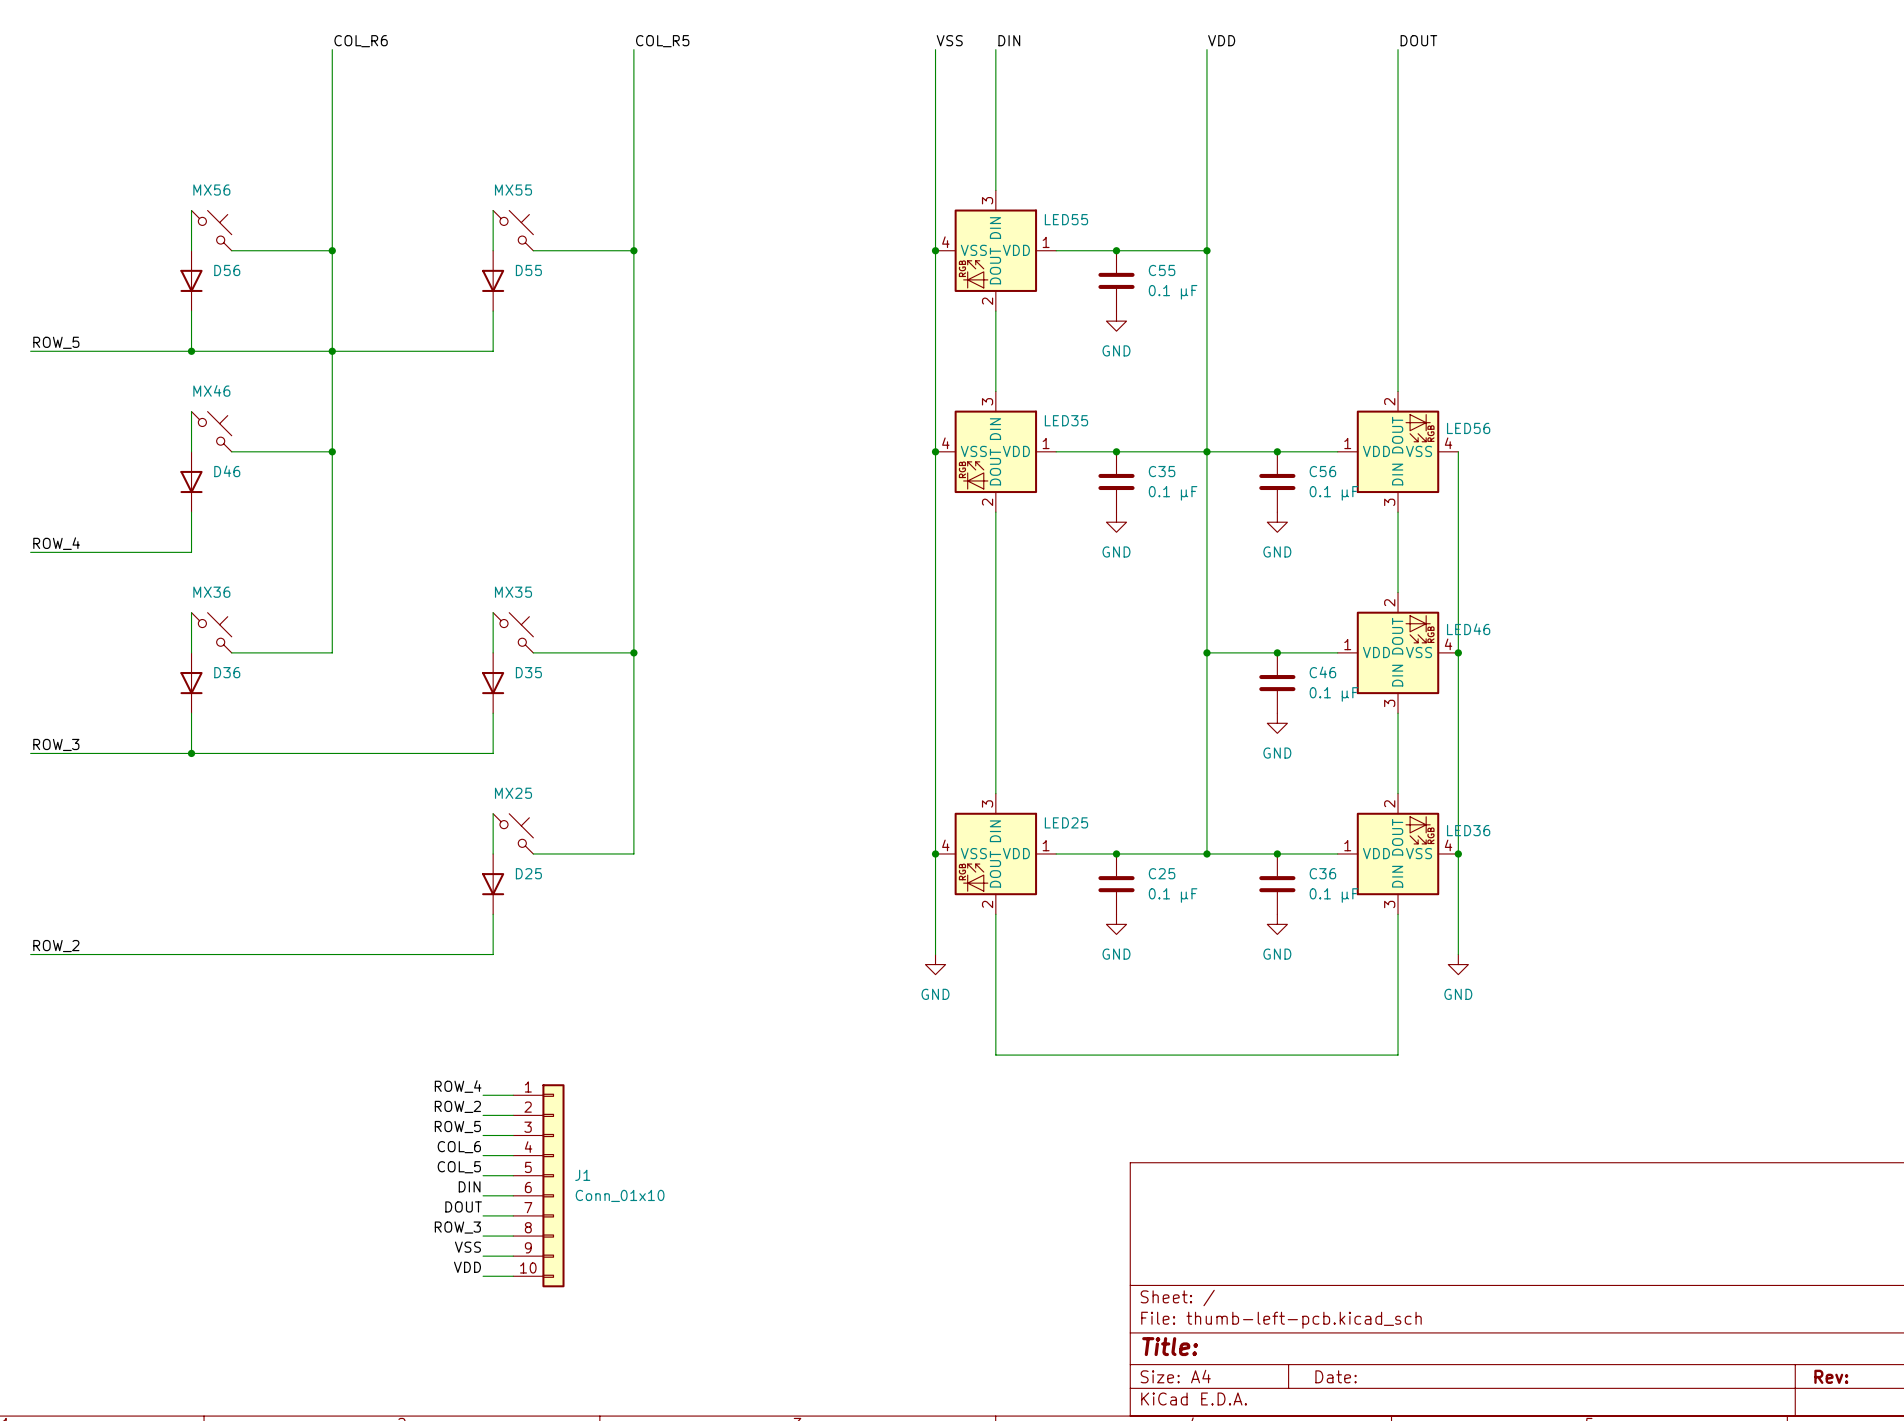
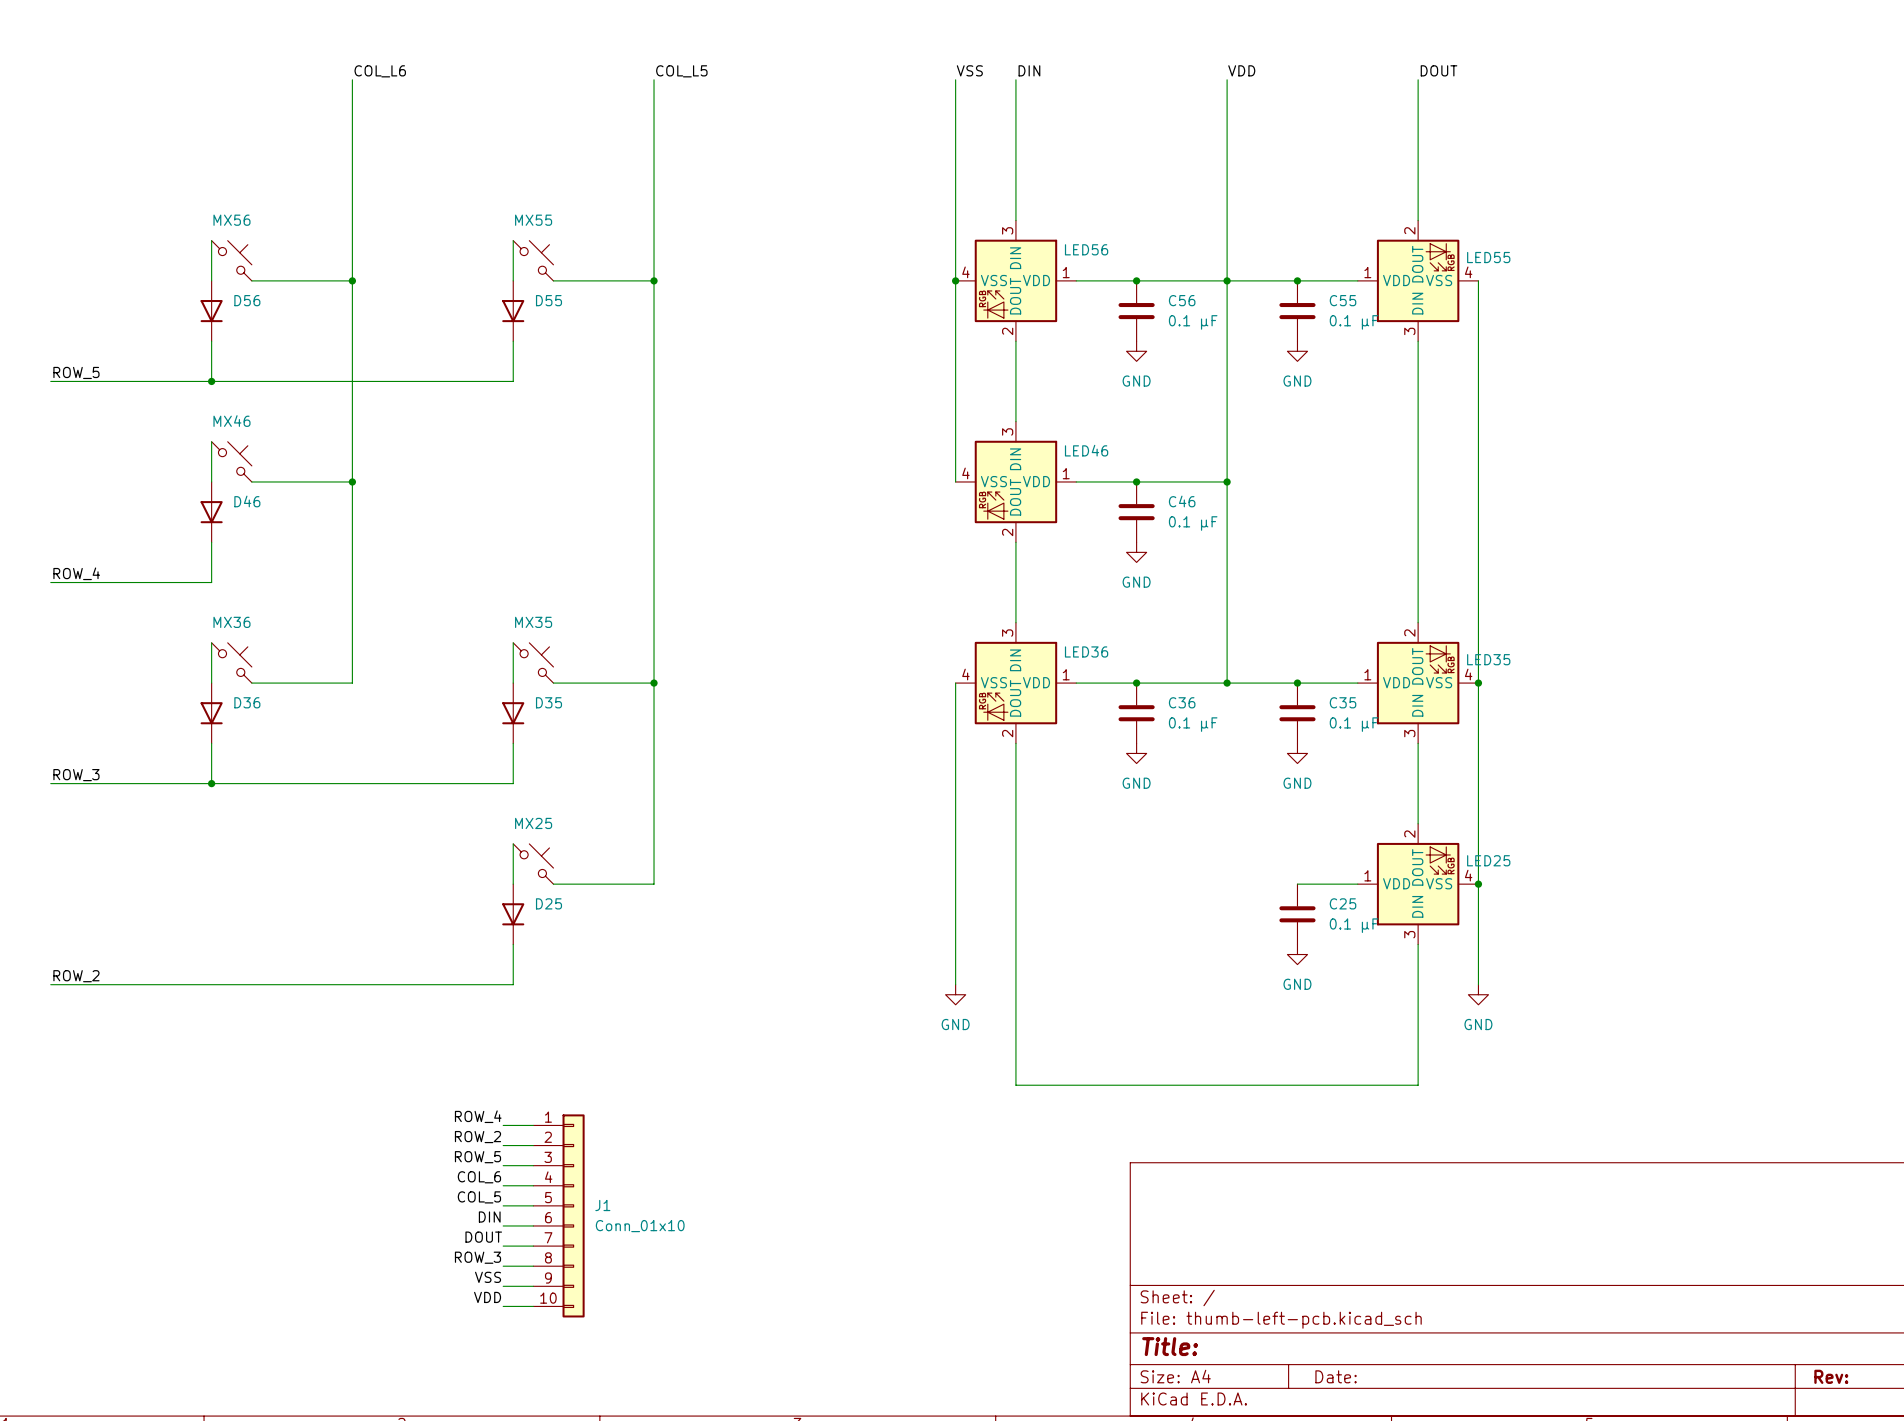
label position: VSS (949, 40) -> VSS (969, 70)
label position: DIN (1009, 40) -> DIN (1029, 70)
label position: VDD (1221, 40) -> VDD (1241, 70)
label position: DOUT (1418, 40) -> DOUT (1439, 70)
label: COL_R6 (361, 41) -> none
label: COL_R5 (662, 41) -> none
wire: (332, 49) (332, 652) (231, 652) -> (352, 79) (352, 683) (251, 683)
wire: (633, 49) (633, 853) (533, 853) -> (654, 79) (654, 884) (553, 884)
wire: (935, 49) (935, 954) -> none
wire: (995, 49) (995, 190) -> (1015, 79) (1015, 220)
wire: (1206, 49) (1206, 853) -> none
wire: (1398, 49) (1398, 391) -> none
label: none -> COL_L6 (380, 71)
label: none -> COL_L5 (681, 71)
wire: none -> (955, 79) (955, 481)
wire: none -> (1227, 79) (1227, 683)
wire: none -> (1418, 79) (1418, 220)
wire: (191, 210) (191, 250) -> (211, 240) (211, 280)
wire: (493, 210) (493, 250) -> (513, 240) (513, 280)
MX56 position: (211, 230) -> (231, 260)
MX55 position: (513, 230) -> (533, 260)
wire: (231, 250) (332, 250) -> (251, 280) (352, 280)
junction position: (332, 250) -> (352, 280)
wire: (533, 250) (633, 250) -> (553, 280) (654, 280)
junction position: (633, 250) -> (654, 280)
junction position: (935, 250) -> (955, 280)
LED55 rotation: 0° (995, 250) -> 180° (1418, 280)
LED55 position: (995, 250) -> (1418, 280)
wire: (1056, 250) (1206, 250) -> none
junction position: (1116, 250) -> (1136, 280)
junction position: (1206, 250) -> (1227, 280)
D56 position: (191, 280) -> (211, 311)
D55 position: (493, 280) -> (513, 311)
C55 position: (1116, 280) -> (1297, 311)
junction: none -> (1297, 280)
wire: none -> (1478, 280) (1478, 984)
wire: (191, 311) (191, 351) -> (211, 341) (211, 381)
wire: (493, 311) (493, 351) (30, 351) -> (513, 341) (513, 381) (50, 381)
wire: (995, 311) (995, 391) -> (1015, 341) (1015, 421)
power symbol position: GND (1116, 321) -> GND (1136, 351)
wire: none -> (1418, 341) (1418, 622)
label position: ROW_5 (56, 342) -> ROW_5 (76, 372)
junction position: (191, 351) -> (211, 381)
junction: (332, 351) -> none
power symbol: none -> GND (1297, 351)
wire: (191, 411) (191, 451) -> (211, 441) (211, 481)
MX46 position: (211, 431) -> (231, 461)
wire: (231, 451) (332, 451) -> (251, 481) (352, 481)
junction position: (332, 451) -> (352, 481)
junction: (935, 451) -> none
LED35 rotation: 0° (995, 451) -> 180° (1418, 683)
LED35 position: (995, 451) -> (1418, 683)
wire: (1056, 451) (1337, 451) -> (1076, 280) (1357, 280)
junction position: (1116, 451) -> (1136, 481)
junction: (1206, 451) -> none
junction: (1277, 451) -> none
LED56 rotation: 0° (1398, 451) -> 180° (1015, 280)
LED56 position: (1398, 451) -> (1015, 280)
wire: (1458, 451) (1458, 954) -> none
D46 position: (191, 481) -> (211, 512)
wire: none -> (1076, 481) (1227, 481)
C35 position: (1116, 481) -> (1297, 713)
junction: none -> (1227, 481)
C56 position: (1277, 481) -> (1136, 311)
wire: (191, 512) (191, 552) (30, 552) -> (211, 542) (211, 582) (50, 582)
wire: (995, 512) (995, 793) -> none
wire: (1398, 512) (1398, 592) -> none
power symbol position: GND (1116, 522) -> GND (1136, 552)
power symbol: GND (1277, 522) -> none
wire: none -> (1015, 542) (1015, 622)
label position: ROW_4 (56, 543) -> ROW_4 (76, 573)
wire: (191, 612) (191, 652) -> (211, 642) (211, 683)
wire: (493, 612) (493, 652) -> (513, 642) (513, 683)
MX36 position: (211, 632) -> (231, 662)
MX35 position: (513, 632) -> (533, 662)
wire: (533, 652) (633, 652) -> (553, 683) (654, 683)
junction position: (633, 652) -> (654, 683)
wire: (1206, 652) (1337, 652) -> none
junction: (1206, 652) -> none
junction: (1277, 652) -> none
LED46 rotation: 0° (1398, 652) -> 180° (1015, 481)
LED46 position: (1398, 652) -> (1015, 481)
junction position: (1458, 652) -> (1478, 683)
D36 position: (191, 683) -> (211, 713)
D35 position: (493, 683) -> (513, 713)
wire: none -> (955, 683) (955, 984)
junction: none -> (1136, 683)
junction: none -> (1227, 683)
C46 position: (1277, 683) -> (1136, 512)
junction: none -> (1297, 683)
wire: (191, 713) (191, 753) -> (211, 743) (211, 783)
wire: (493, 713) (493, 753) (30, 753) -> (513, 743) (513, 783) (50, 783)
wire: (1398, 713) (1398, 793) -> (1418, 743) (1418, 823)
power symbol position: GND (1277, 723) -> GND (1297, 753)
wire: none -> (1015, 743) (1015, 1085) (1418, 1085) (1418, 944)
label position: ROW_3 (56, 744) -> ROW_3 (76, 775)
junction position: (191, 753) -> (211, 783)
power symbol: none -> GND (1136, 753)
wire: (493, 813) (493, 853) -> (513, 843) (513, 884)
MX25 position: (513, 833) -> (533, 864)
junction: (935, 853) -> none
LED25 rotation: 0° (995, 853) -> 180° (1418, 884)
LED25 position: (995, 853) -> (1418, 884)
wire: (1056, 853) (1337, 853) -> (1076, 683) (1357, 683)
junction: (1116, 853) -> none
junction: (1206, 853) -> none
junction: (1277, 853) -> none
LED36 rotation: 0° (1398, 853) -> 180° (1015, 683)
LED36 position: (1398, 853) -> (1015, 683)
junction position: (1458, 853) -> (1478, 884)
D25 position: (493, 884) -> (513, 914)
C25 position: (1116, 884) -> (1297, 914)
C36 position: (1277, 884) -> (1136, 713)
wire: none -> (1297, 884) (1357, 884)
wire: (493, 914) (493, 954) (30, 954) -> (513, 944) (513, 984) (50, 984)
wire: (995, 914) (995, 1055) (1398, 1055) (1398, 914) -> none
power symbol: GND (1116, 924) -> none
power symbol position: GND (1277, 924) -> GND (1297, 954)
label position: ROW_2 (56, 946) -> ROW_2 (76, 976)
power symbol position: GND (935, 964) -> GND (955, 994)
power symbol position: GND (1458, 964) -> GND (1478, 994)
label position: ROW_4 (458, 1086) -> ROW_4 (478, 1116)
wire: (483, 1095) (513, 1095) -> (503, 1125) (533, 1125)
label position: ROW_2 (457, 1106) -> ROW_2 (477, 1137)
wire: (483, 1115) (513, 1115) -> (503, 1145) (533, 1145)
label position: ROW_5 (457, 1127) -> ROW_5 (477, 1157)
wire: (483, 1135) (513, 1135) -> (503, 1165) (533, 1165)
label position: COL_6 (459, 1147) -> COL_6 (479, 1177)
wire: (483, 1155) (513, 1155) -> (503, 1185) (533, 1185)
label position: COL_5 (459, 1167) -> COL_5 (479, 1197)
wire: (483, 1175) (513, 1175) -> (503, 1205) (533, 1205)
J1 position: (538, 1185) -> (559, 1215)
label position: DIN (469, 1186) -> DIN (489, 1217)
wire: (483, 1195) (513, 1195) -> (503, 1225) (533, 1225)
label position: DOUT (463, 1206) -> DOUT (483, 1237)
wire: (483, 1215) (513, 1215) -> (503, 1246) (533, 1246)
label position: ROW_3 (457, 1227) -> ROW_3 (477, 1257)
wire: (483, 1236) (513, 1236) -> (503, 1266) (533, 1266)
label position: VSS (467, 1247) -> VSS (488, 1277)
wire: (483, 1256) (513, 1256) -> (503, 1286) (533, 1286)
label position: VDD (467, 1267) -> VDD (487, 1297)
wire: (483, 1276) (513, 1276) -> (503, 1306) (533, 1306)

